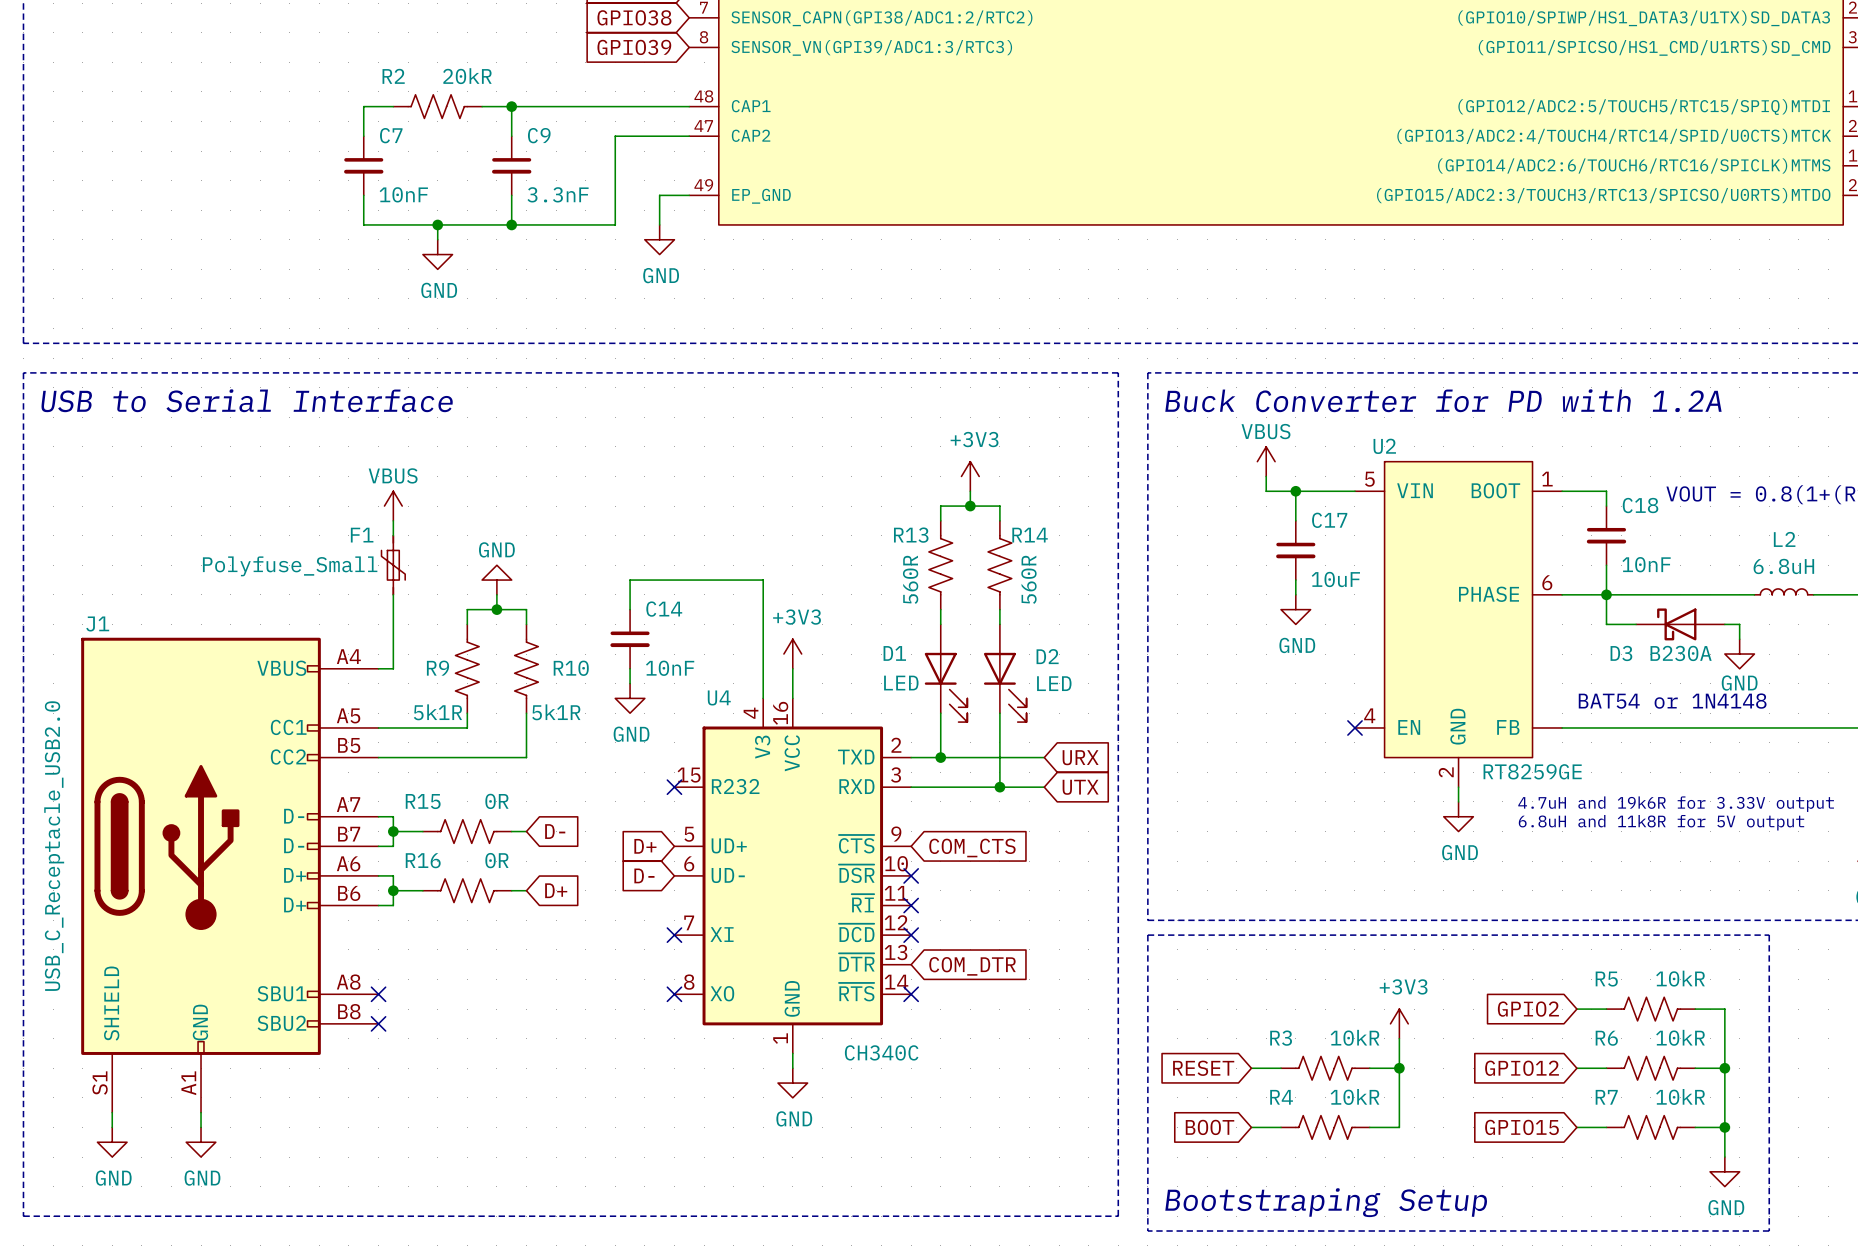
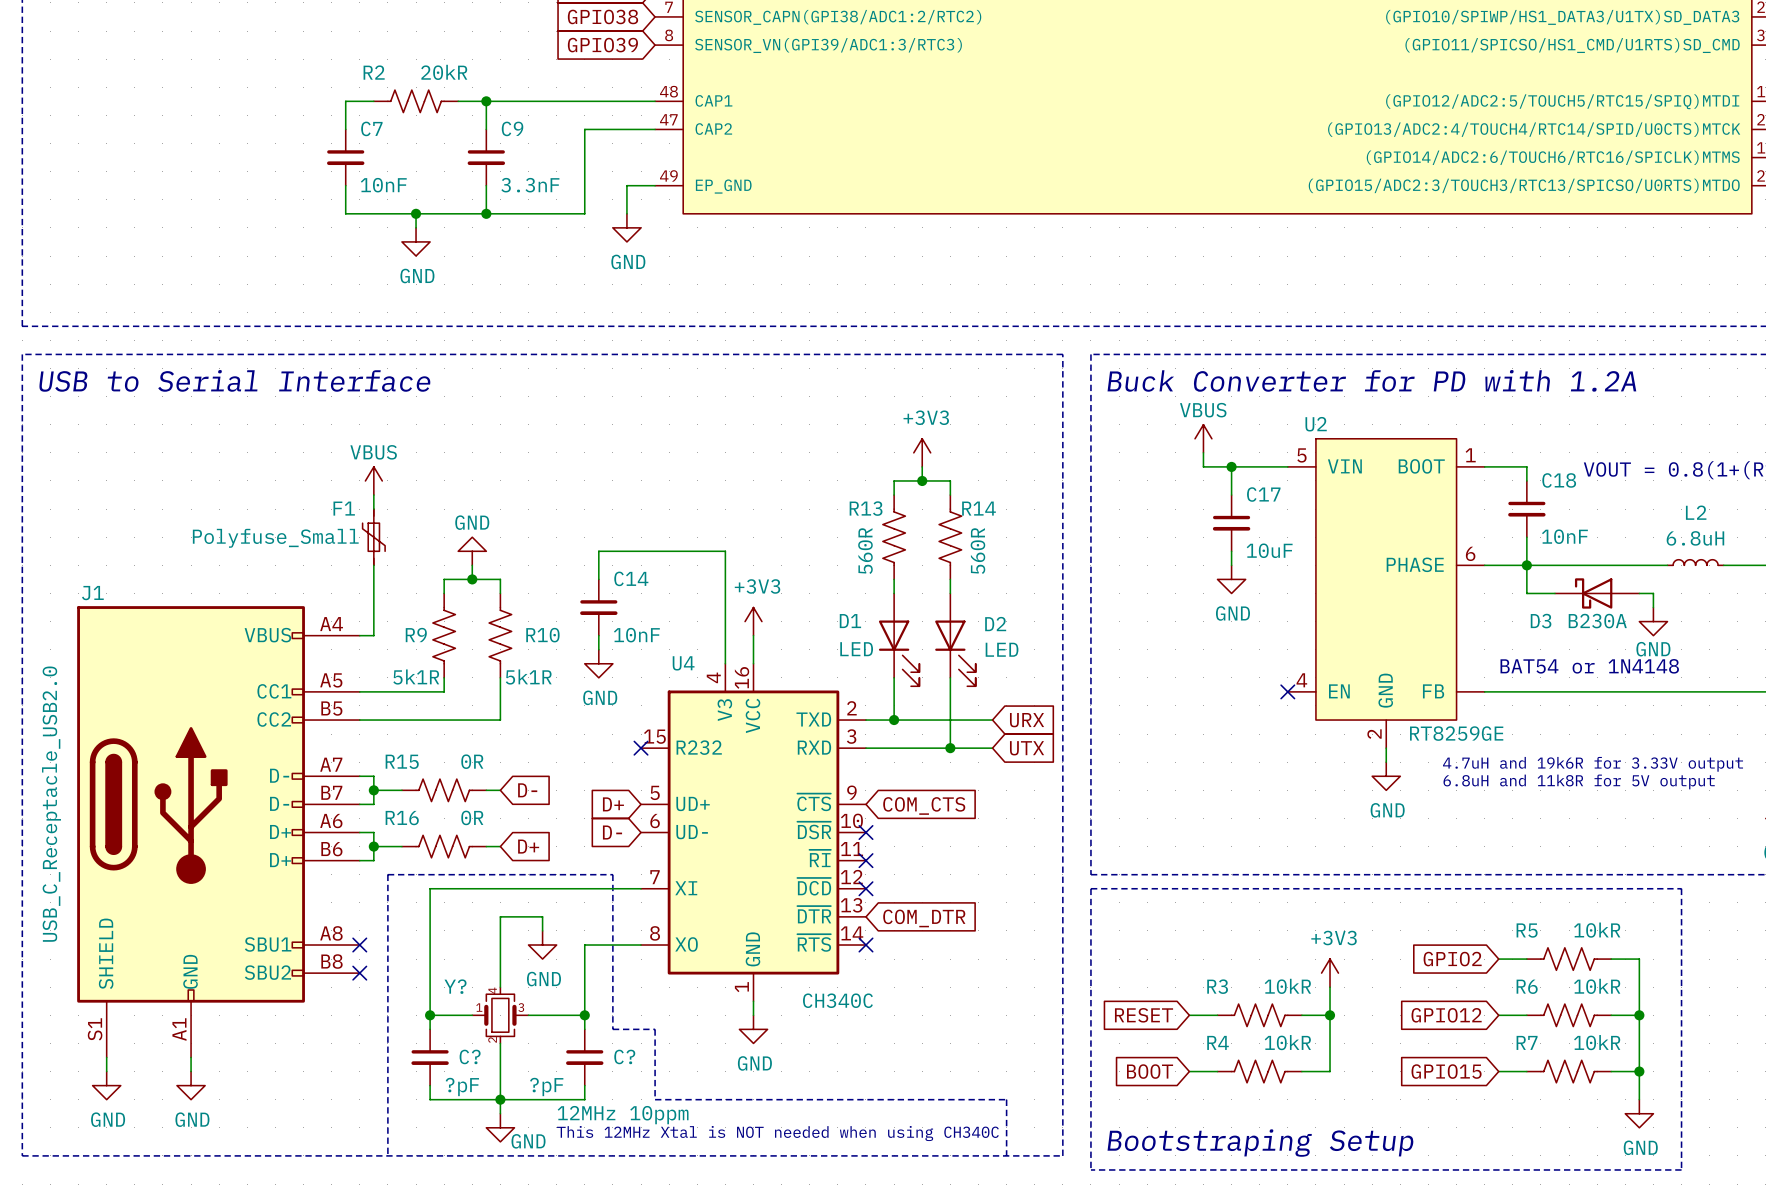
wire: none -> (641, 888) (430, 888) (430, 1029)
no-connect mark: (674, 935) -> none
wire: none -> (542, 930) (542, 916) (500, 916) (500, 987)
power symbol: none -> GND (542, 945)
wire: none -> (641, 945) (584, 945) (584, 1029)
no-connect mark: (674, 994) -> none
wire: none -> (430, 1015) (472, 1015)
junction: none -> (430, 1015)
Y?: none -> 12MHz 10ppm (500, 1015)
wire: none -> (528, 1015) (584, 1015)
junction: none -> (584, 1015)
wire: none -> (500, 1043) (500, 1113)
C?: none -> ?pF (430, 1057)
C?: none -> ?pF (584, 1057)
wire: none -> (430, 1085) (430, 1099) (584, 1099) (584, 1085)
junction: none -> (500, 1099)
power symbol: none -> GND (500, 1127)
text: none -> This 12MHz Xtal is NOT needed when using CH340C (777, 1133)
line: none -> (387, 1155) (387, 874) (612, 874) (612, 1029) (655, 1029) (655, 1099) (1006, 1099) (1006, 1155)

